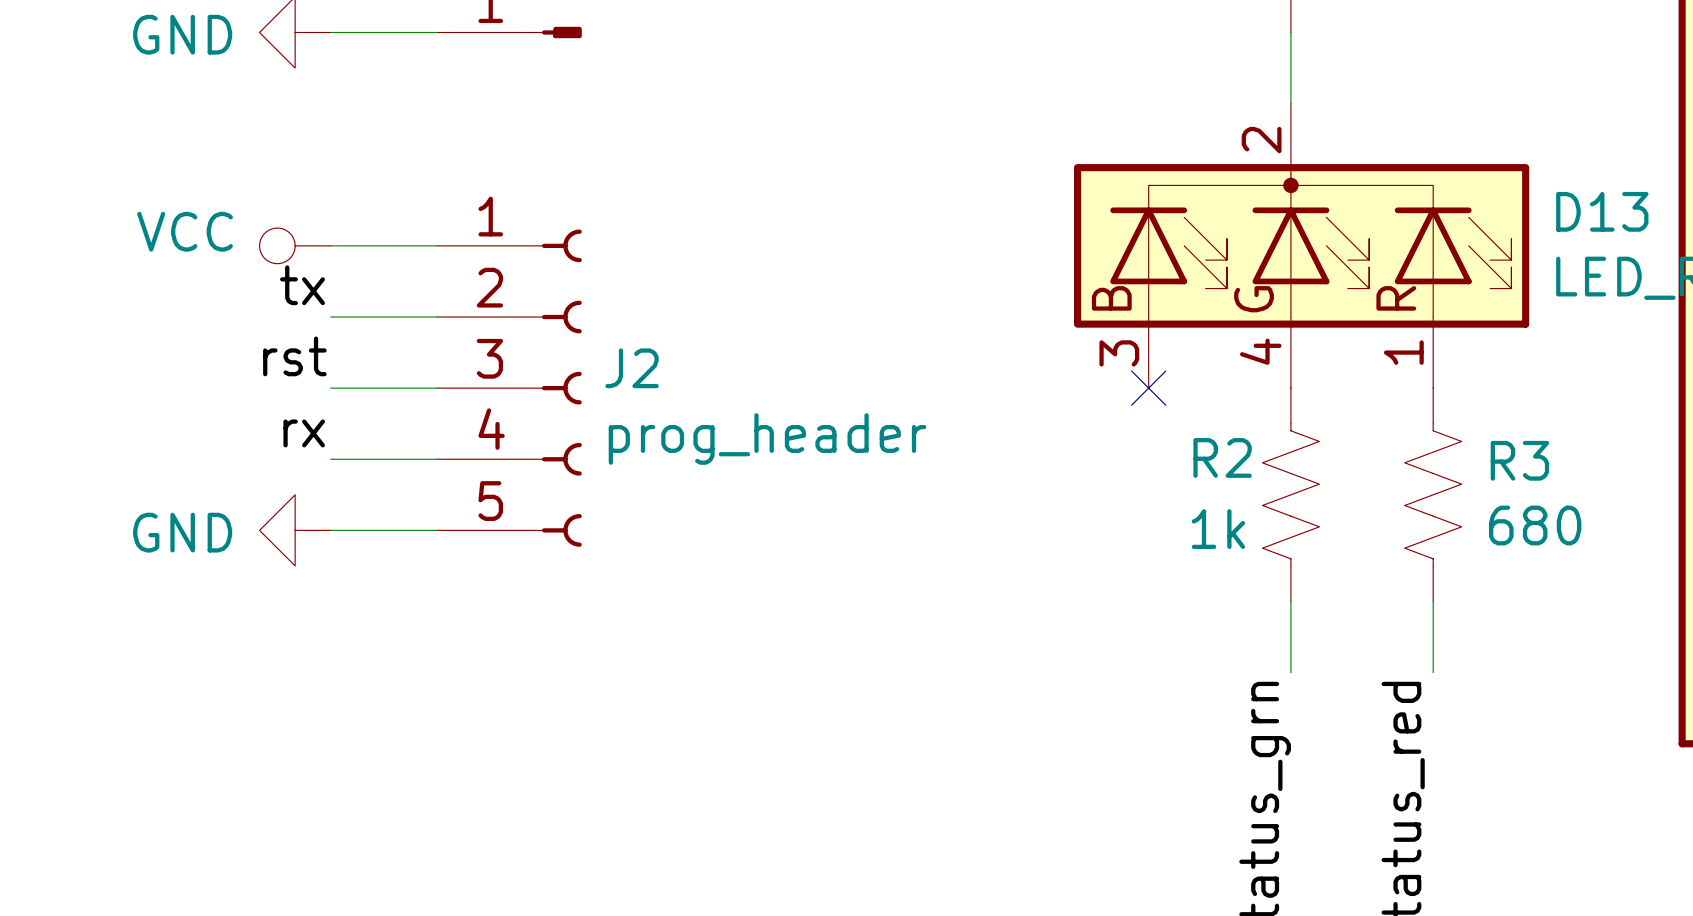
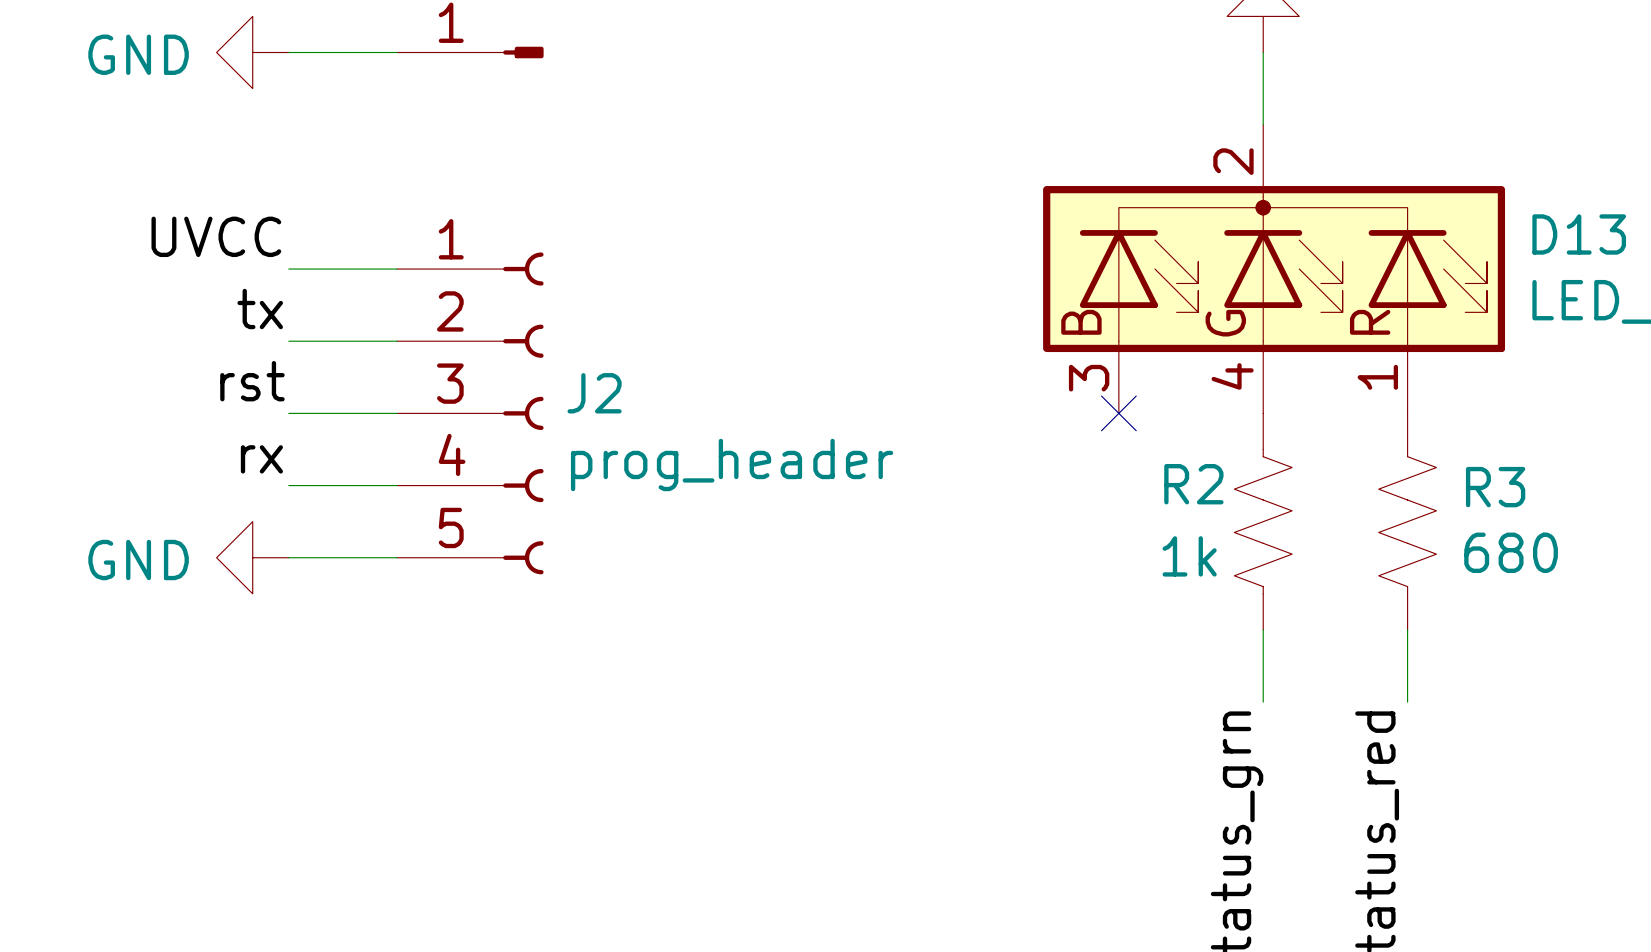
label: none -> UVCC (216, 236)
power symbol: VCC (295, 245) -> none

